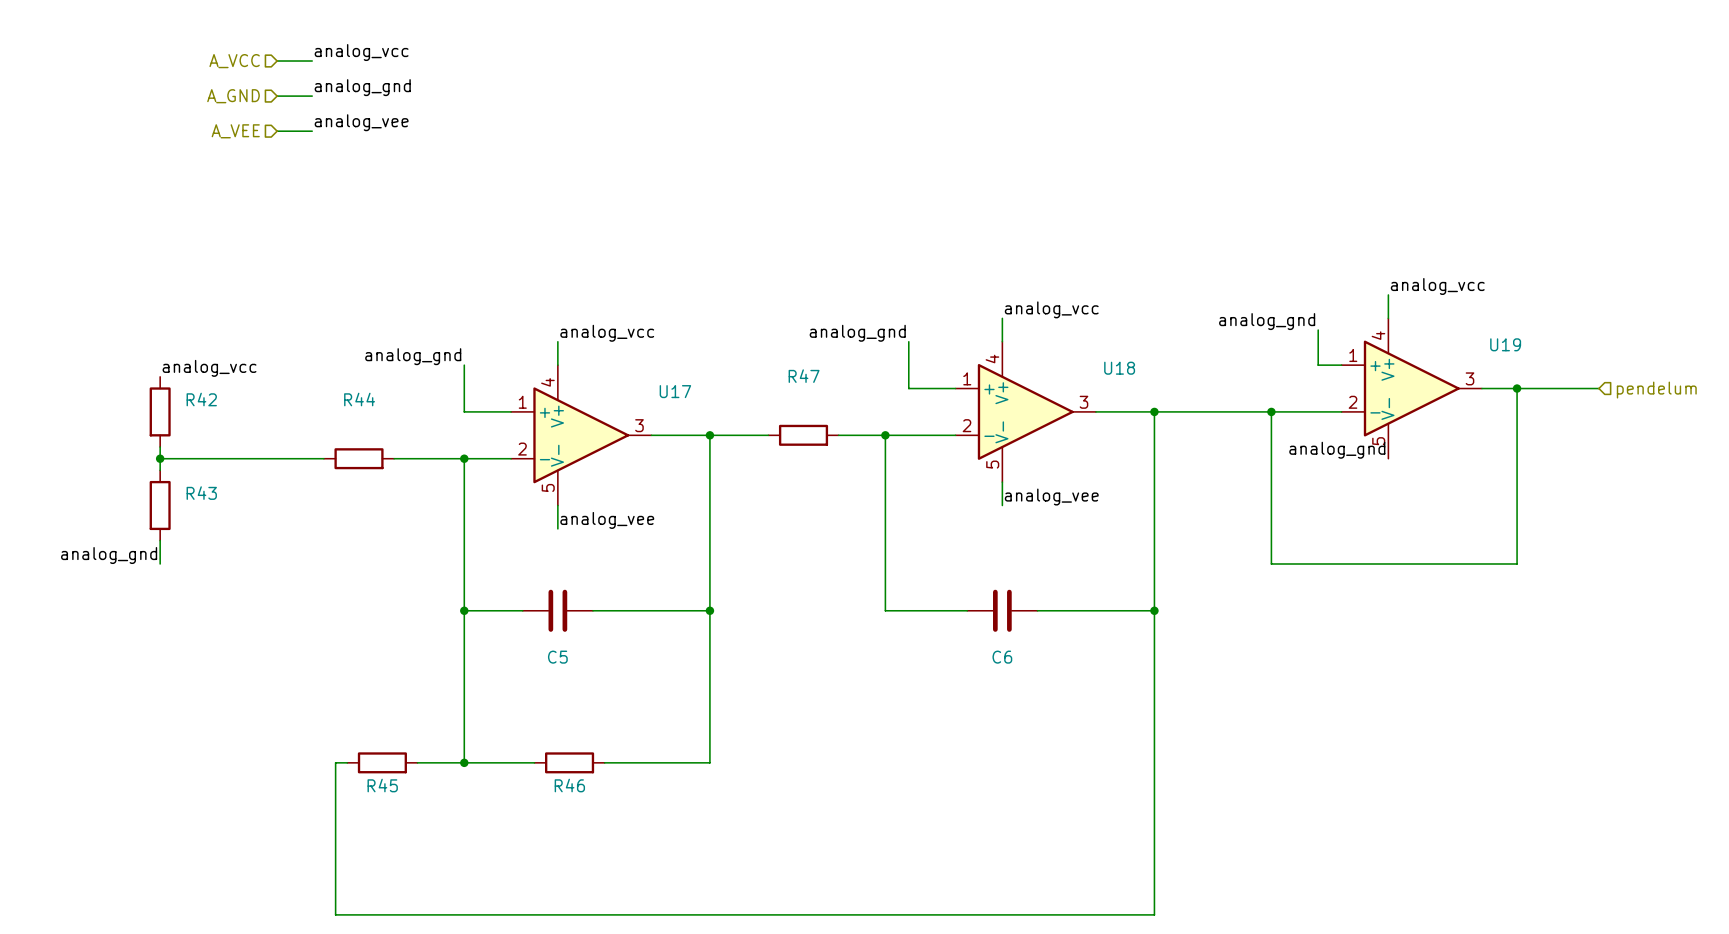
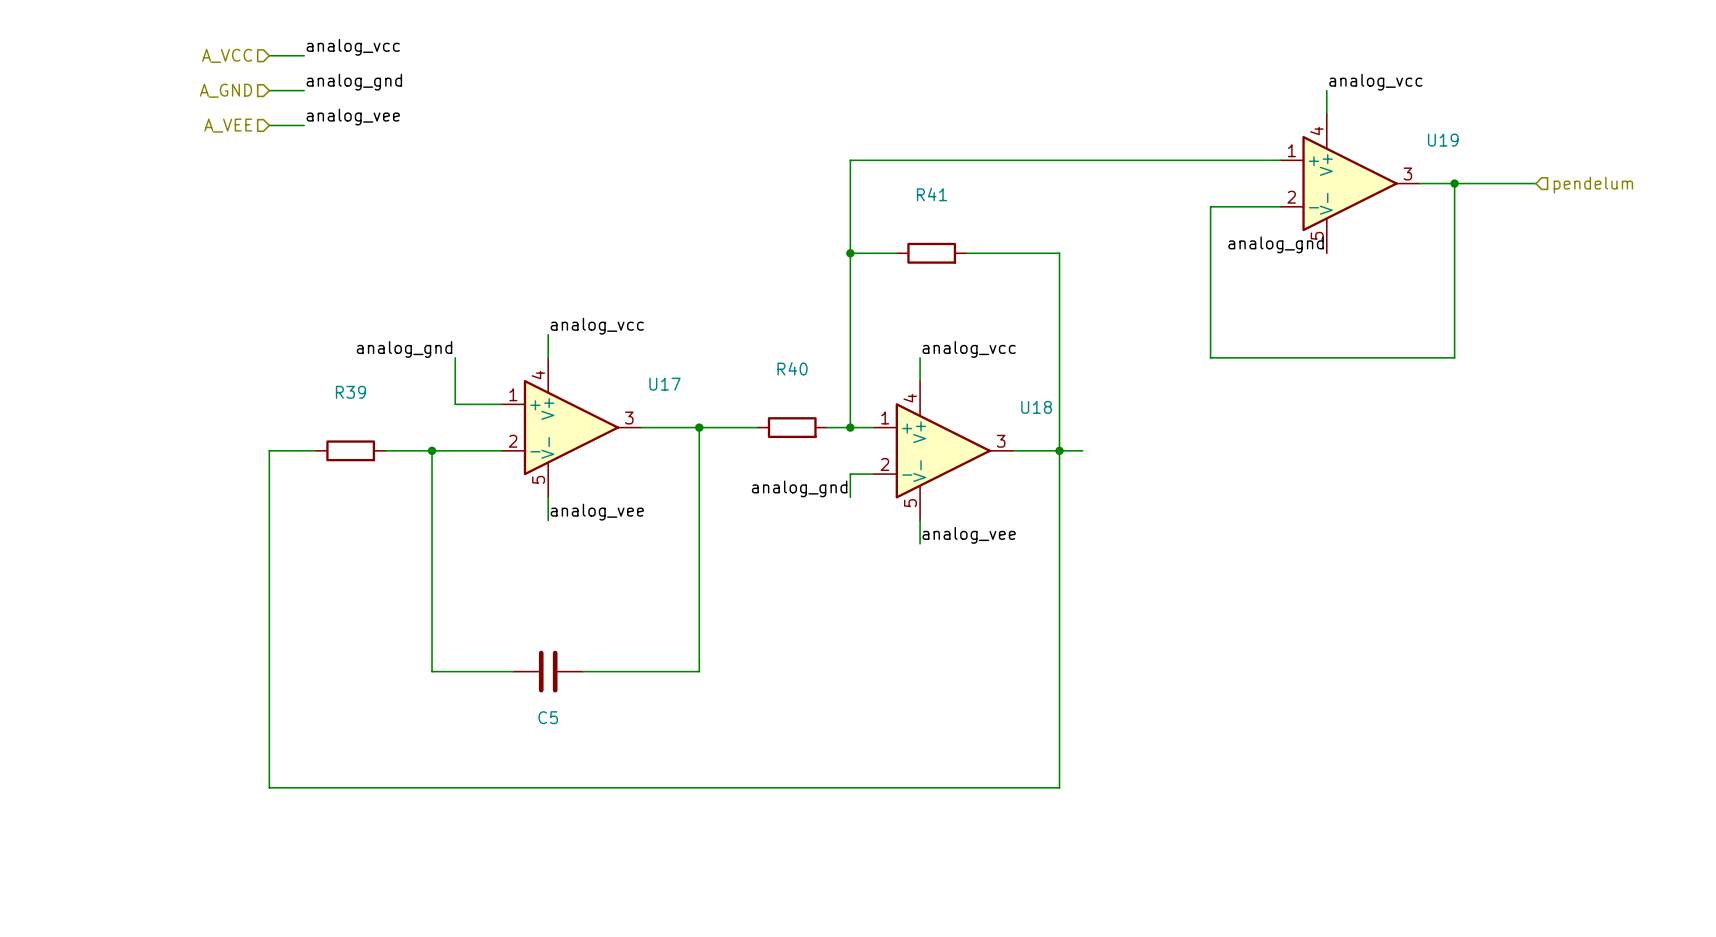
label: none -> analog_vcc (1375, 82)
wire: none -> (1280, 160) (850, 160) (850, 427)
wire: none -> (1454, 183) (1454, 357) (1326, 357)
junction: none -> (1454, 183)
wire: none -> (850, 253) (896, 253)
junction: none -> (850, 253)
R41: none -> (931, 253)
label: analog_vcc (1437, 286) -> none
wire: (1388, 294) (1388, 318) -> (1326, 90) (1326, 113)
label position: analog_vcc (1051, 309) -> analog_vcc (969, 349)
wire: (1002, 318) (1002, 341) -> (920, 357) (920, 381)
label position: analog_gnd (1267, 321) -> analog_gnd (1276, 244)
wire: (1318, 330) (1318, 365) -> (1280, 206) (1210, 206) (1210, 357) (1303, 357)
label position: analog_gnd (857, 333) -> analog_gnd (799, 488)
wire: (908, 341) (908, 388) (955, 388) -> none
label: analog_vcc (209, 368) -> none
R47 name: R47 (804, 376) -> R40 (792, 368)
U19 position: (1411, 388) -> (1350, 183)
wire: (1481, 388) (1598, 388) -> (1419, 183) (1535, 183)
wire: (1517, 388) (1517, 563) (1271, 563) (1271, 411) -> none
junction: (1517, 388) -> none
hierarchical label position: pendelum (1656, 390) -> pendelum (1593, 185)
R44 name: R44 (359, 399) -> R39 (350, 392)
R42: (160, 411) -> none
U18 position: (1025, 411) -> (943, 450)
wire: (1095, 411) (1341, 411) -> none
wire: (1154, 411) (1154, 914) (335, 914) (335, 762) (347, 762) -> none
junction: (1154, 411) -> none
junction: (1271, 411) -> none
junction position: (885, 435) -> (850, 427)
wire: (955, 435) (885, 435) (885, 610) (967, 610) -> none
wire: (160, 447) (160, 470) -> none
label: analog_gnd (1337, 450) -> none
wire: (160, 458) (277, 458) -> (966, 253) (1059, 253) (1059, 787) (269, 787) (269, 450)
junction: (160, 458) -> none
wire: none -> (432, 450) (432, 671) (513, 671)
wire: (464, 458) (464, 762) -> none
junction position: (464, 458) -> (432, 450)
wire: none -> (1013, 450) (1082, 450)
junction: none -> (1059, 450)
wire: none -> (873, 474) (850, 474) (850, 497)
wire: (1002, 482) (1002, 505) -> (920, 520) (920, 543)
label position: analog_vee (1051, 497) -> analog_vee (969, 535)
R43: (160, 505) -> none
wire: (160, 540) (160, 563) -> none
label: analog_gnd (109, 555) -> none
wire: (464, 610) (522, 610) -> none
junction: (464, 610) -> none
C5 position: (557, 610) -> (548, 671)
wire: (592, 610) (709, 610) -> none
junction: (709, 610) -> none
C6: (1002, 610) -> none
wire: (1037, 610) (1154, 610) -> none
junction: (1154, 610) -> none
wire: (709, 680) (709, 762) (604, 762) -> (699, 671) (583, 671)
R45: (382, 762) -> none
wire: (417, 762) (534, 762) -> none
junction: (464, 762) -> none
R46: (569, 762) -> none

